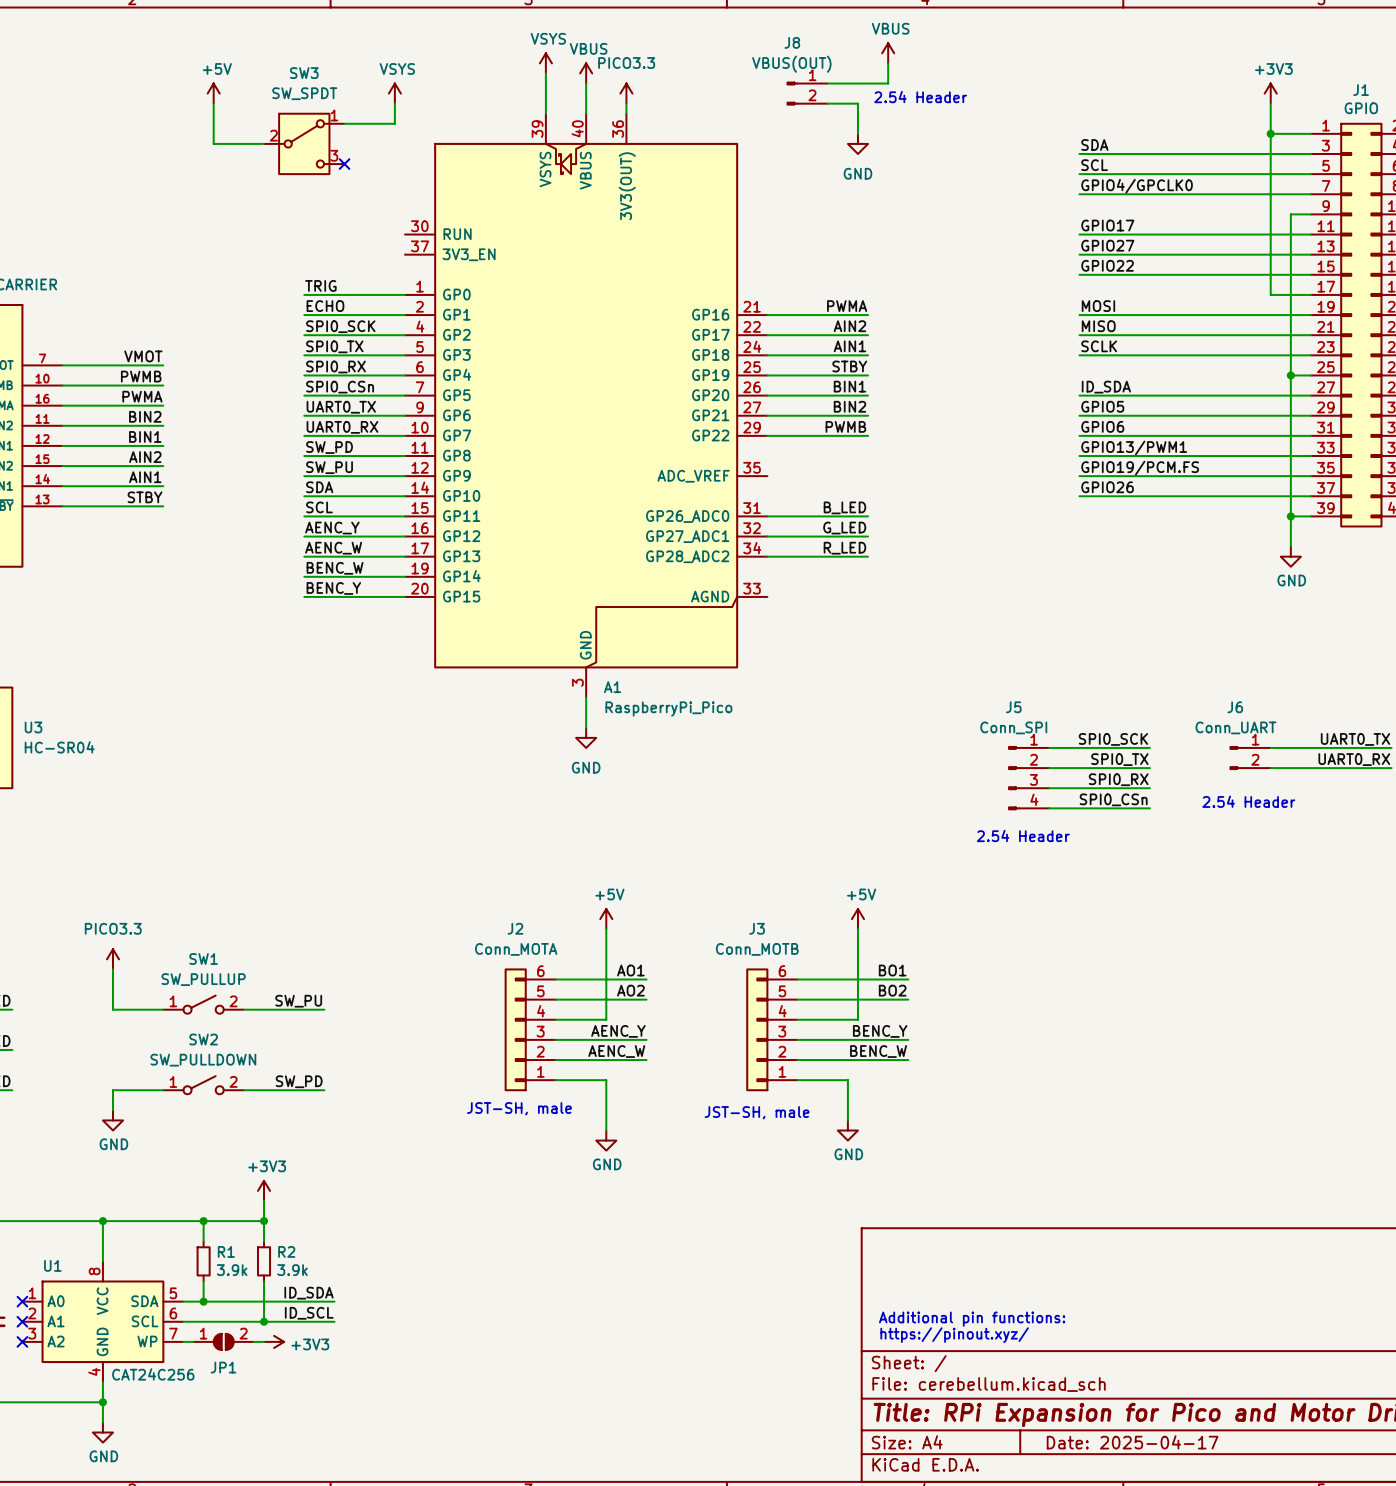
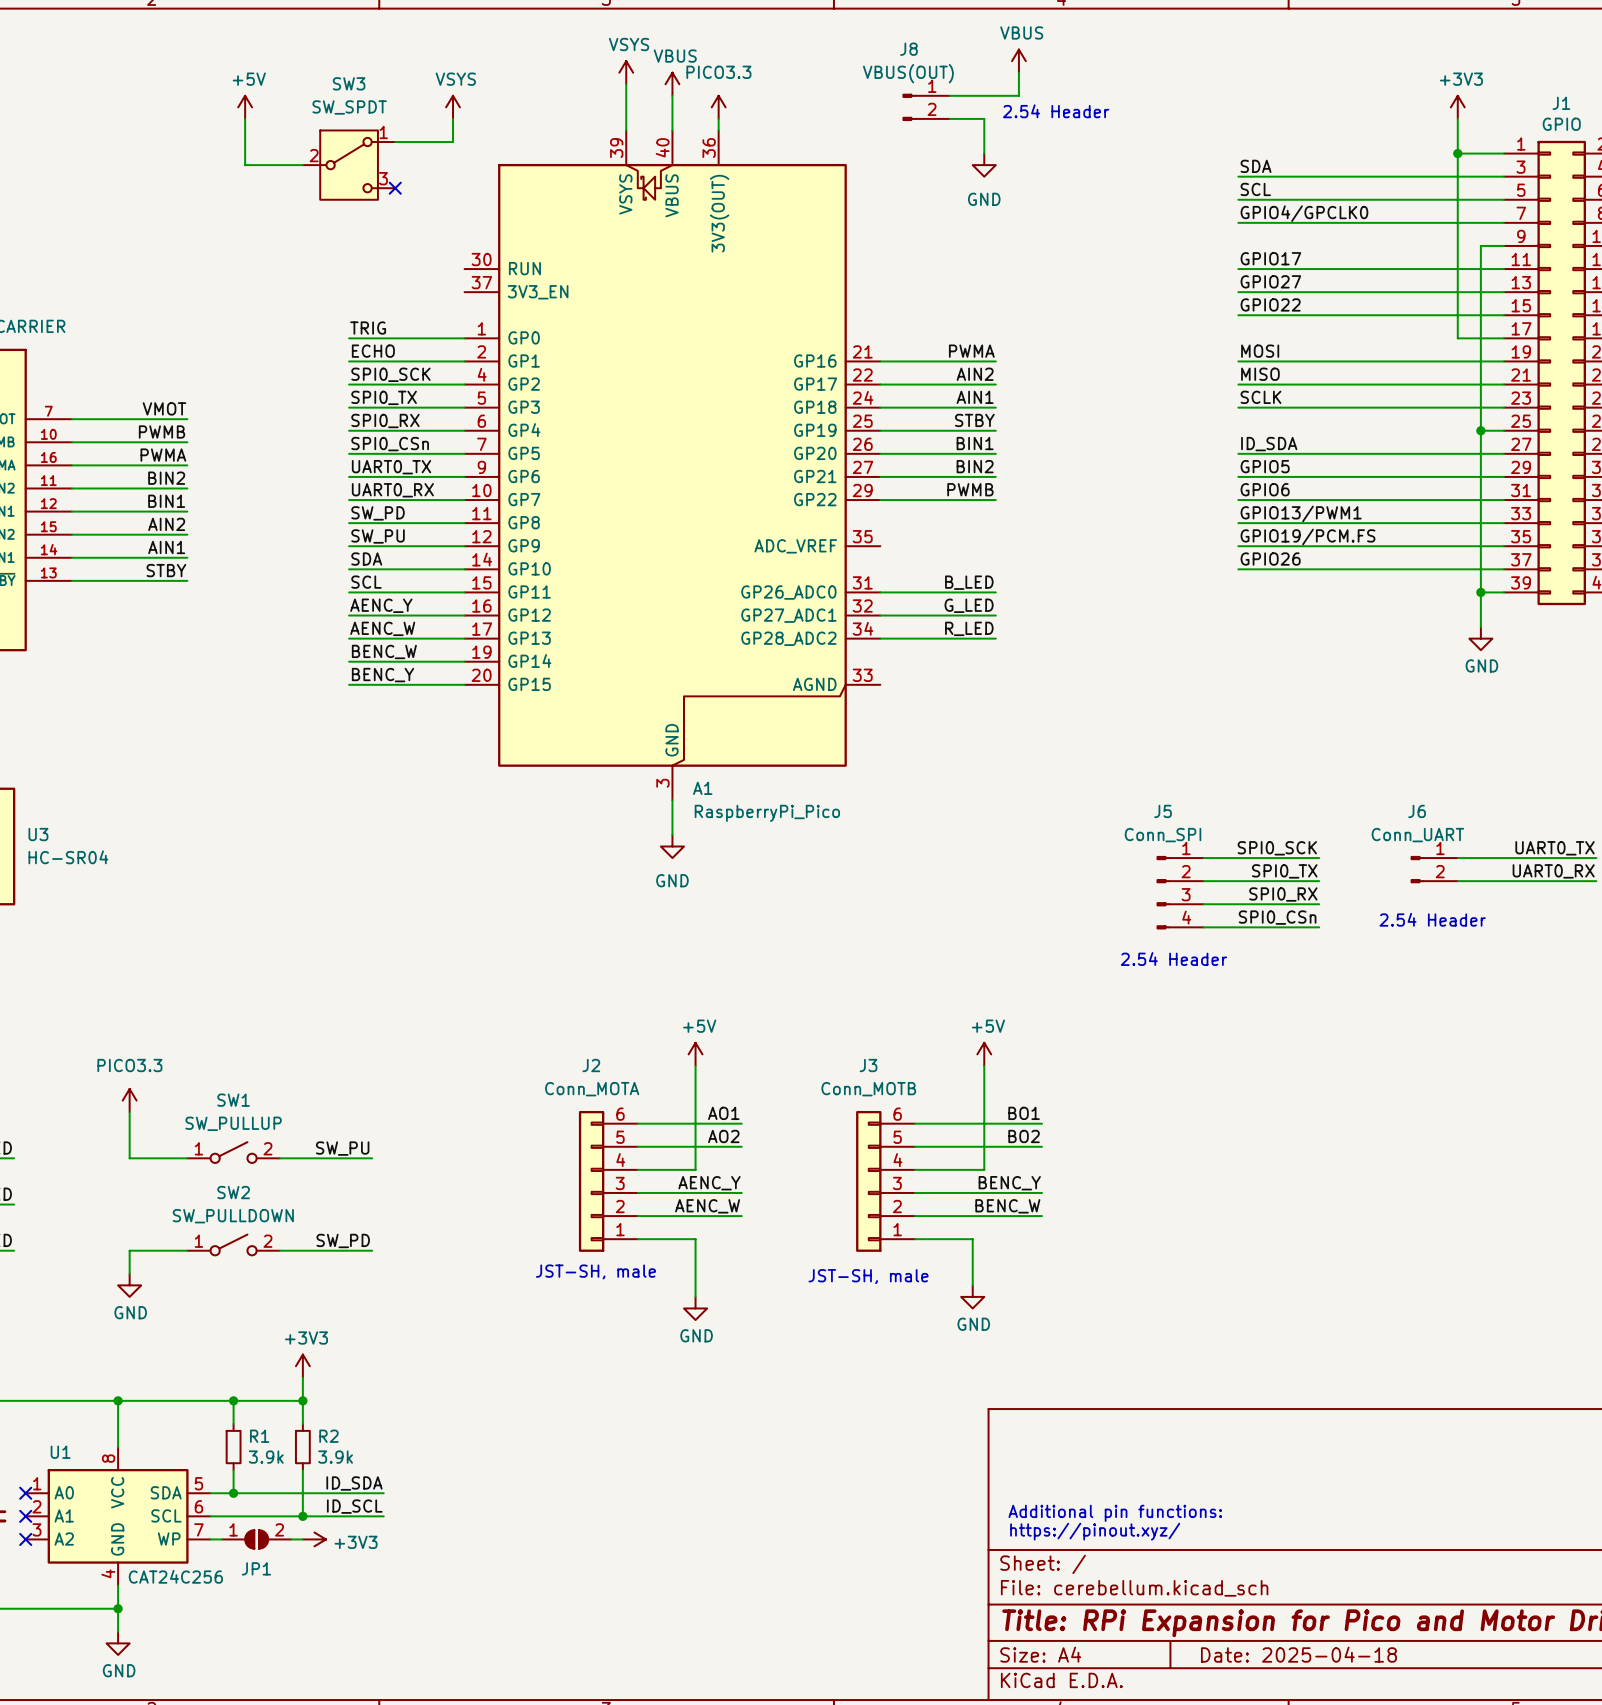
title block: Date: 2025-04-17 (1132, 1442) -> Date: 2025-04-18 (1298, 1654)

